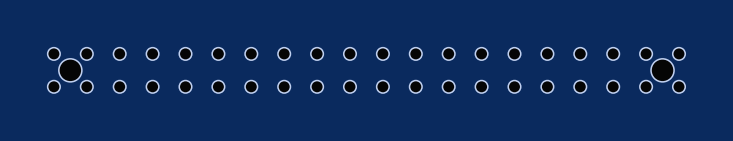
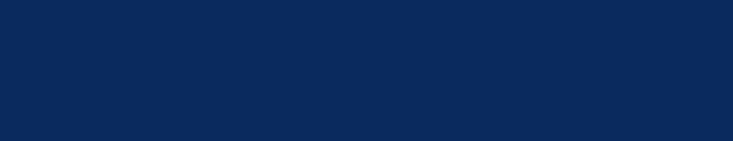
part: (366, 70) -> none

